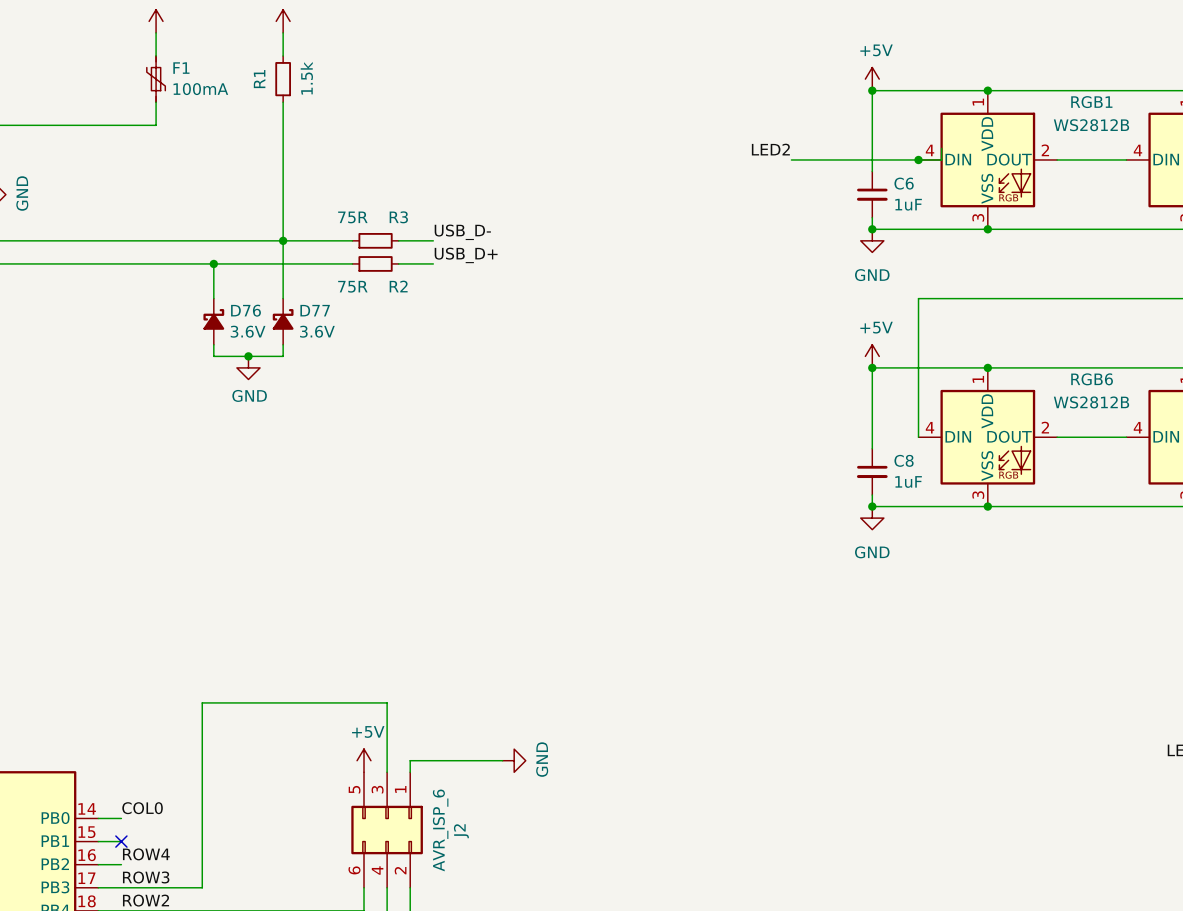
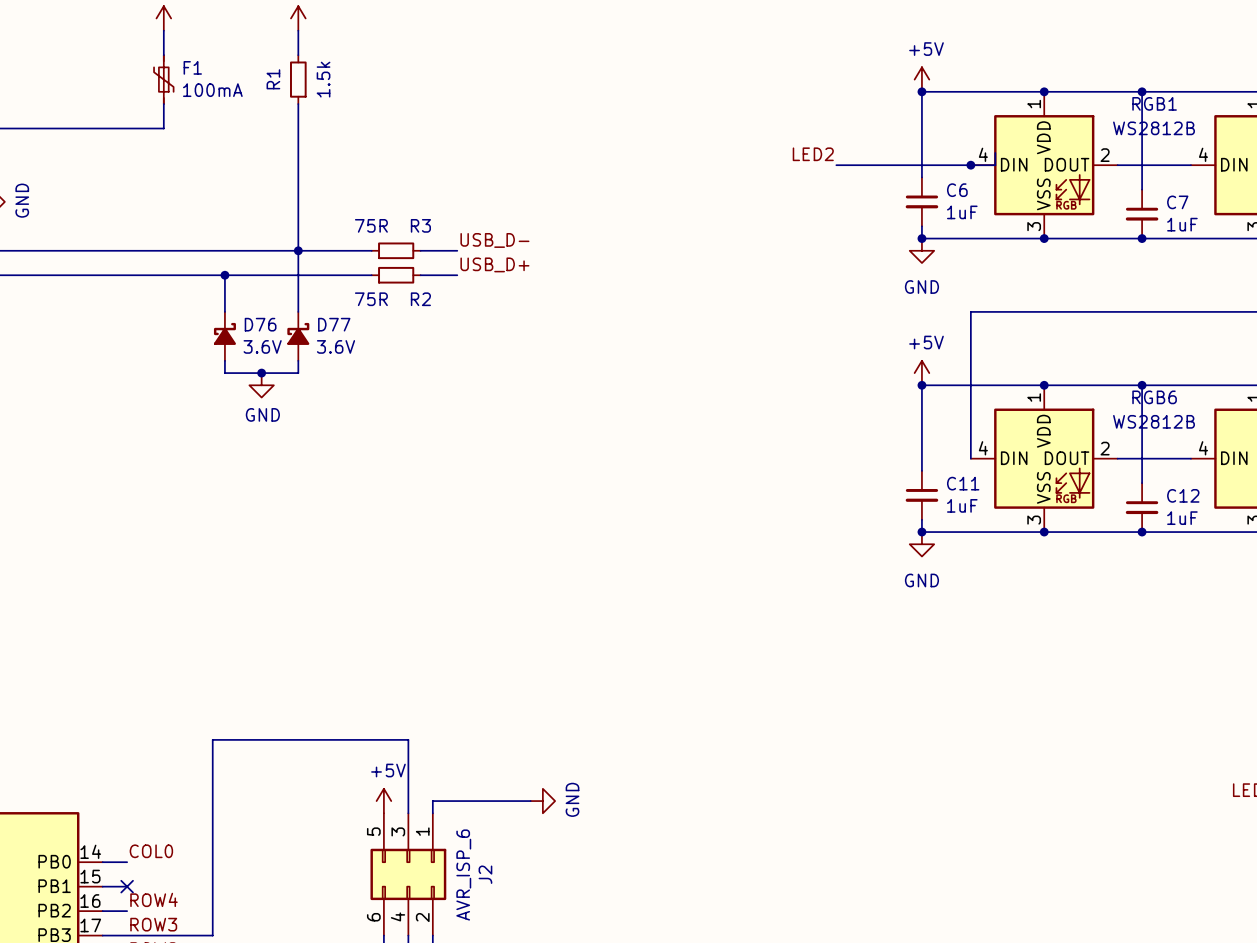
wire: none -> (1142, 91) (1142, 189)
junction: none -> (1142, 91)
C7: none -> 1uF (1142, 214)
junction: none -> (1142, 238)
wire: none -> (1142, 385) (1142, 483)
junction: none -> (1142, 385)
C8 name: C8 (904, 460) -> C11 (963, 483)
C12: none -> 1uF (1142, 507)
junction: none -> (1142, 532)

